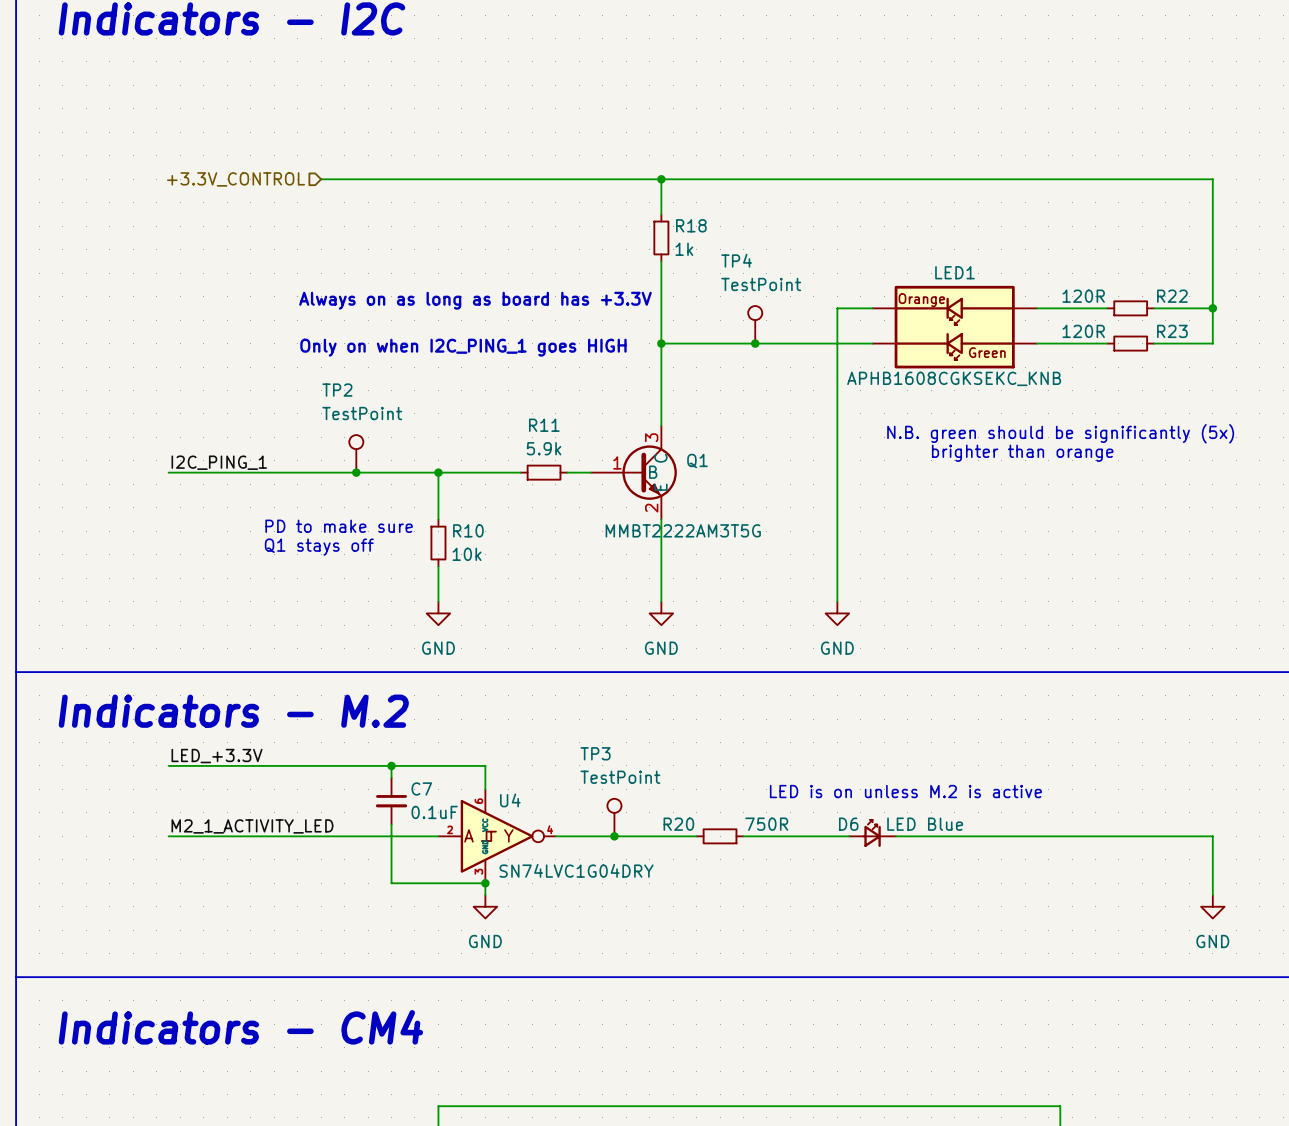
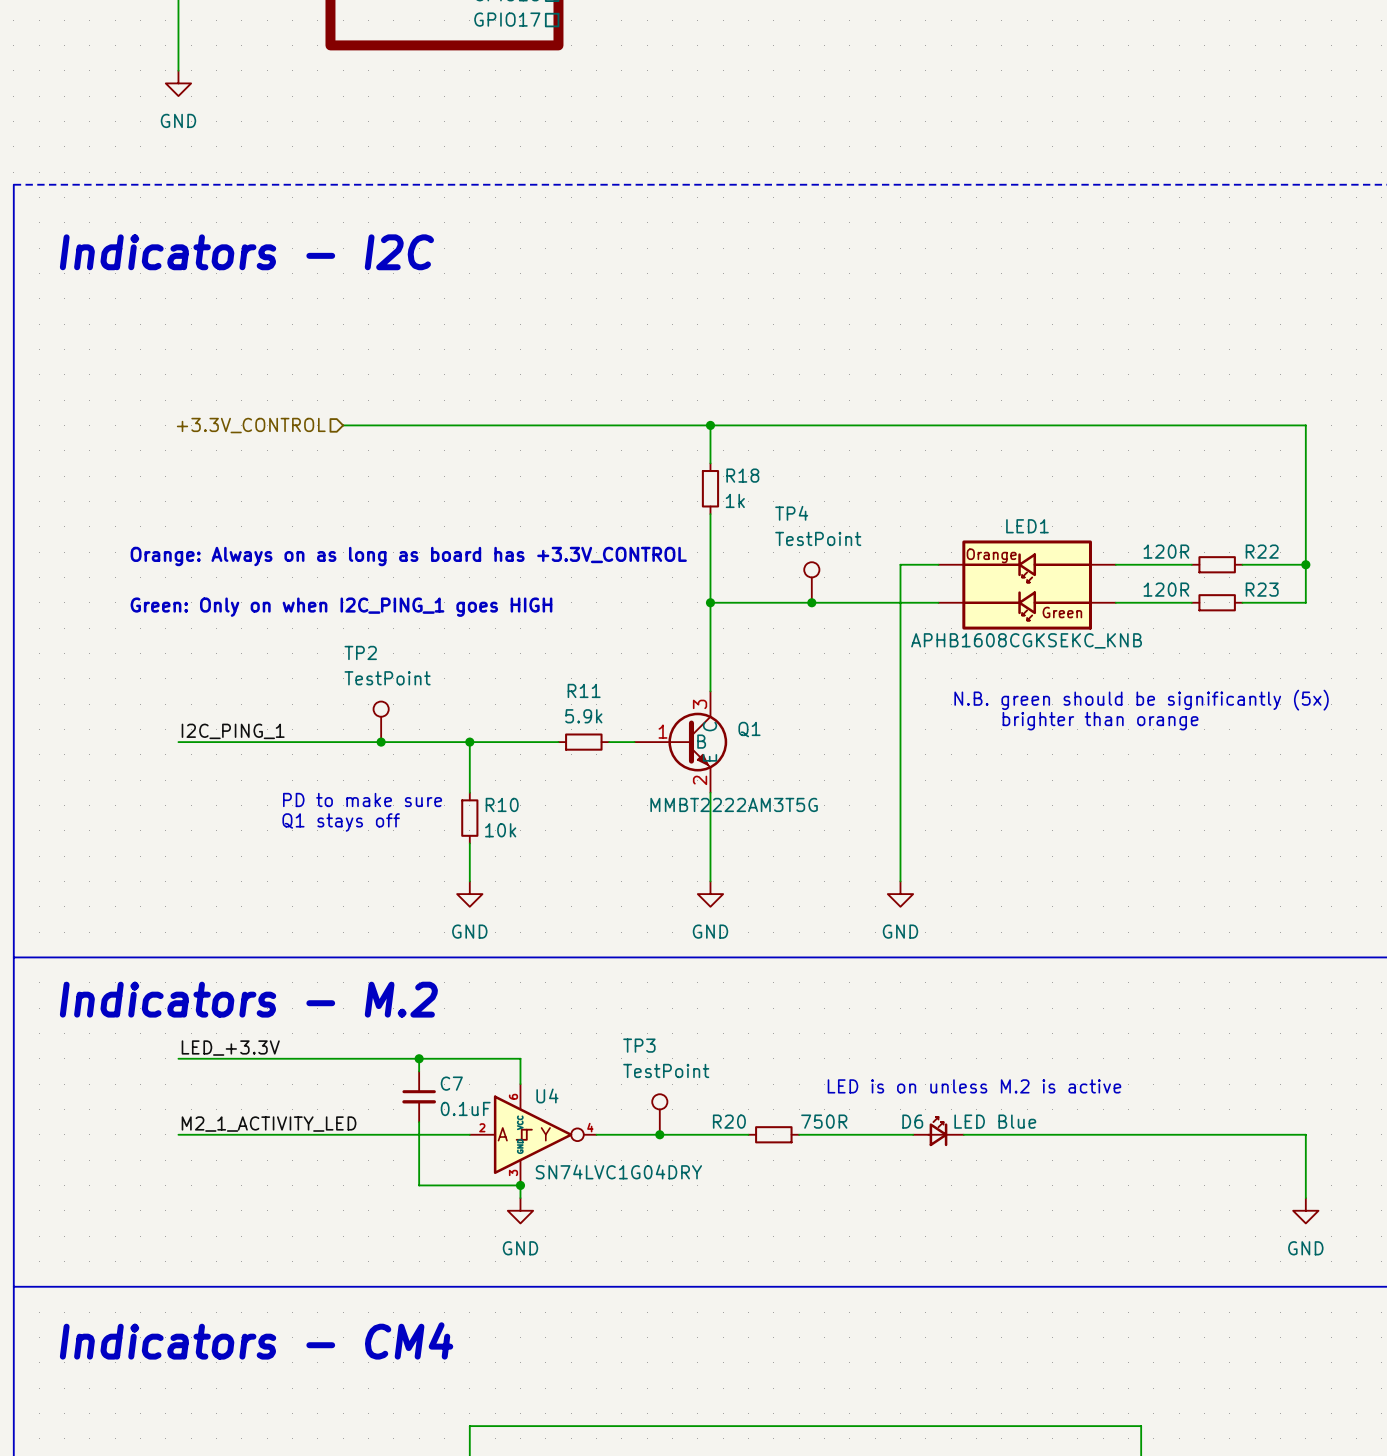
text: Always on as long as board has +3.3V (475, 300) -> Orange: Always on as long as board has +3.3V_CONTROL (408, 556)
text: Only on when I2C_PING_1 goes HIGH (463, 347) -> Green: Only on when I2C_PING_1 goes HIGH (341, 607)

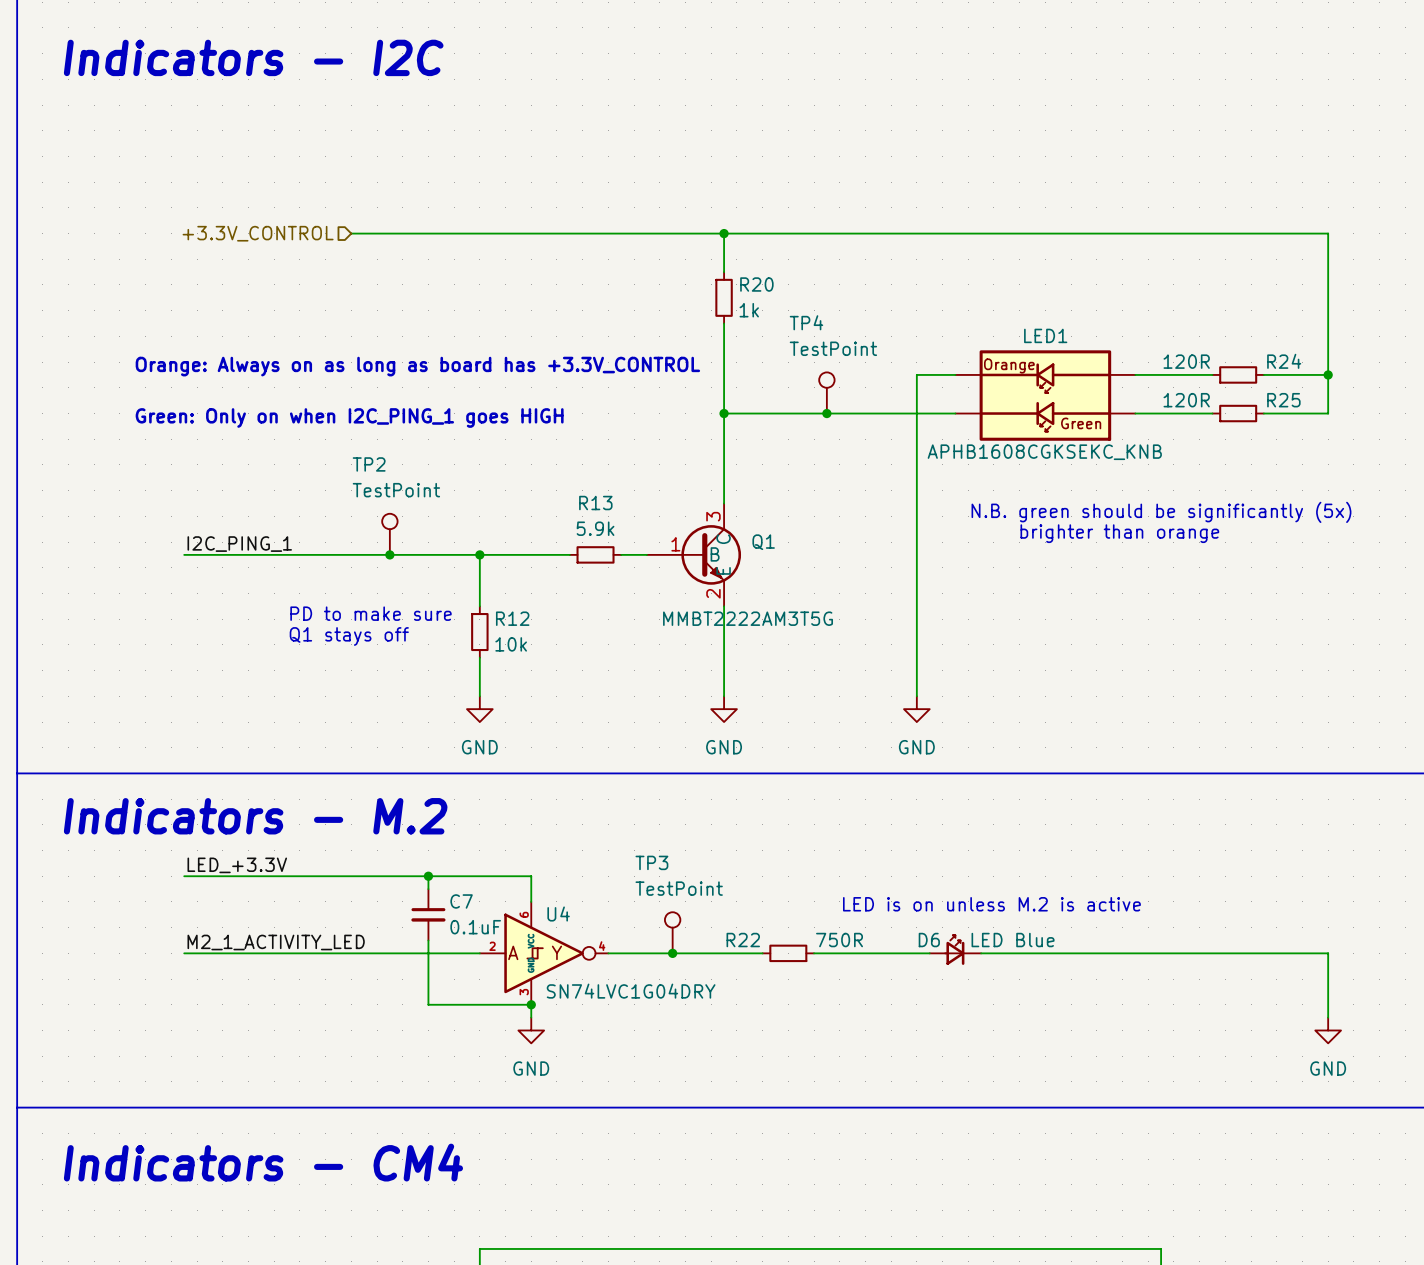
R18 name: R18 (742, 475) -> R20 (756, 284)
R22 name: R22 (1262, 551) -> R24 (1284, 361)
R23 name: R23 (1262, 589) -> R25 (1283, 400)
R11 name: R11 (584, 690) -> R13 (595, 503)
R10 name: R10 (502, 804) -> R12 (512, 618)
R20 name: R20 (729, 1121) -> R22 (743, 940)

